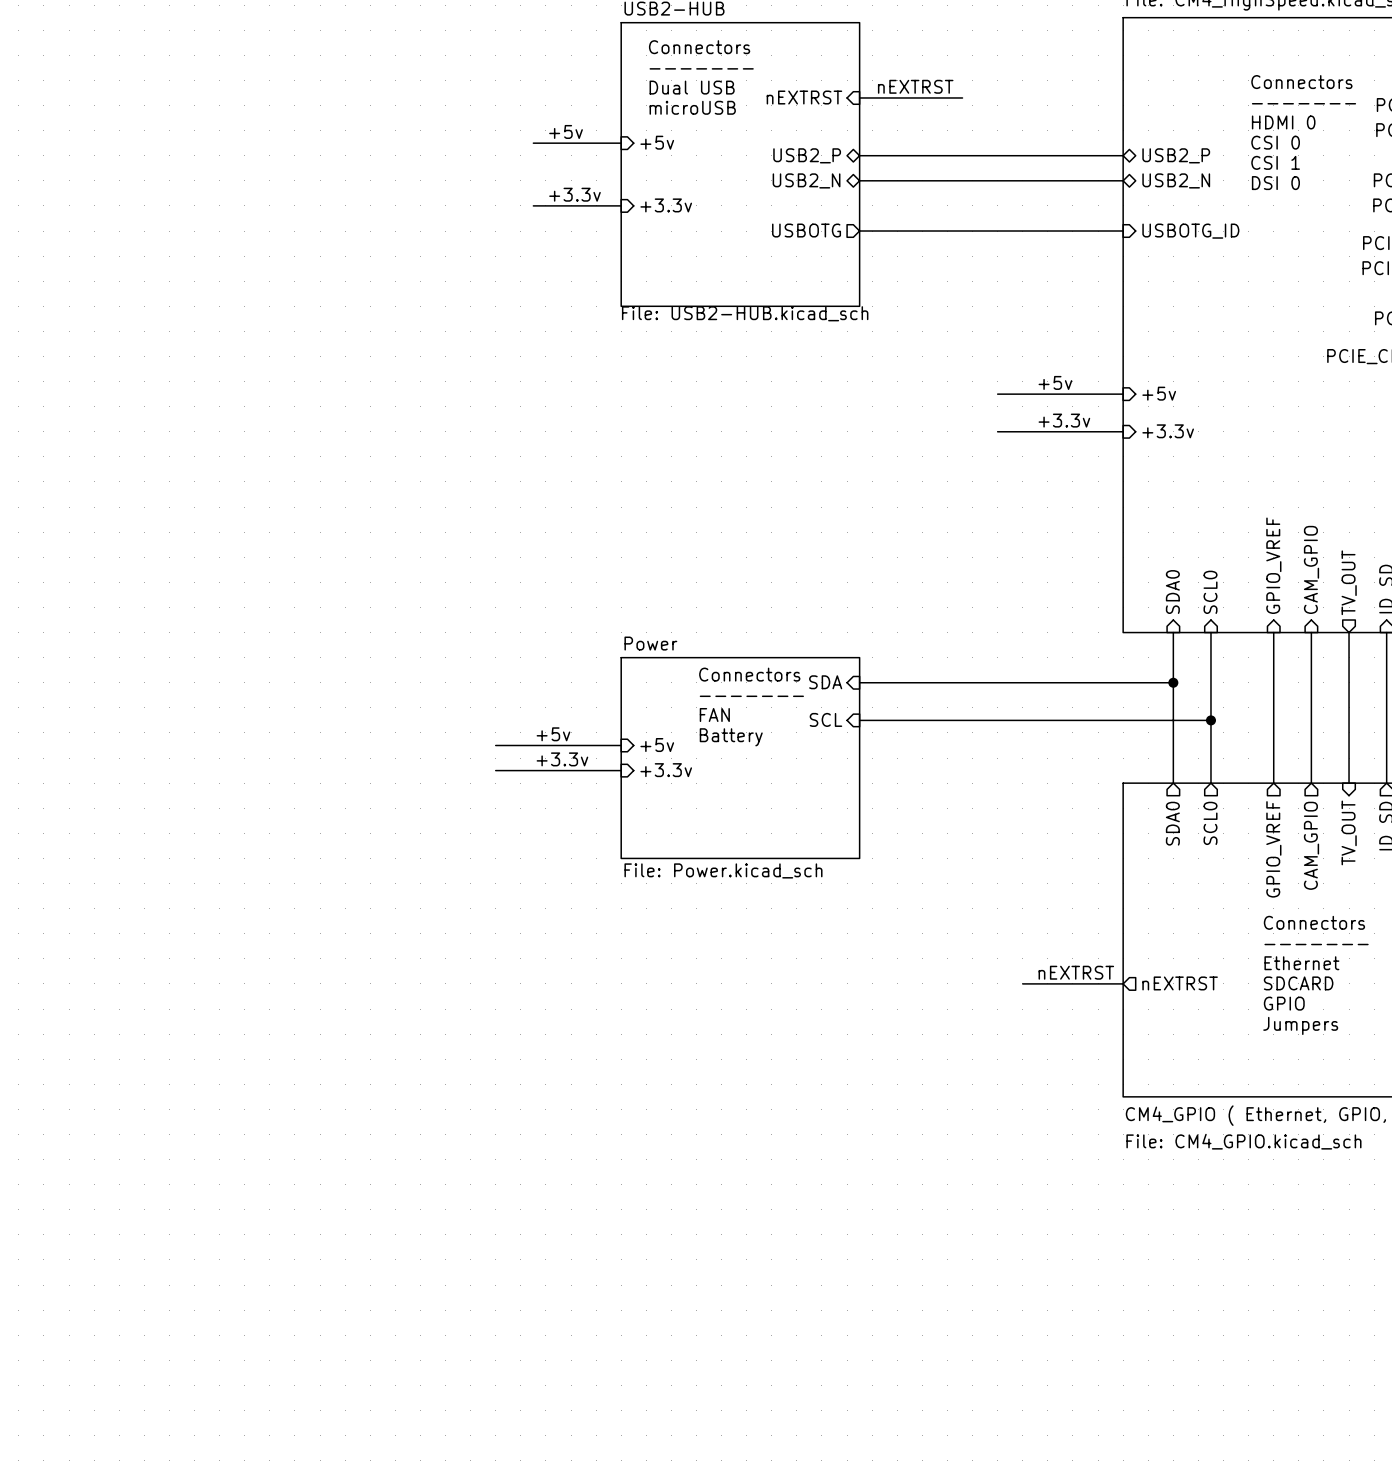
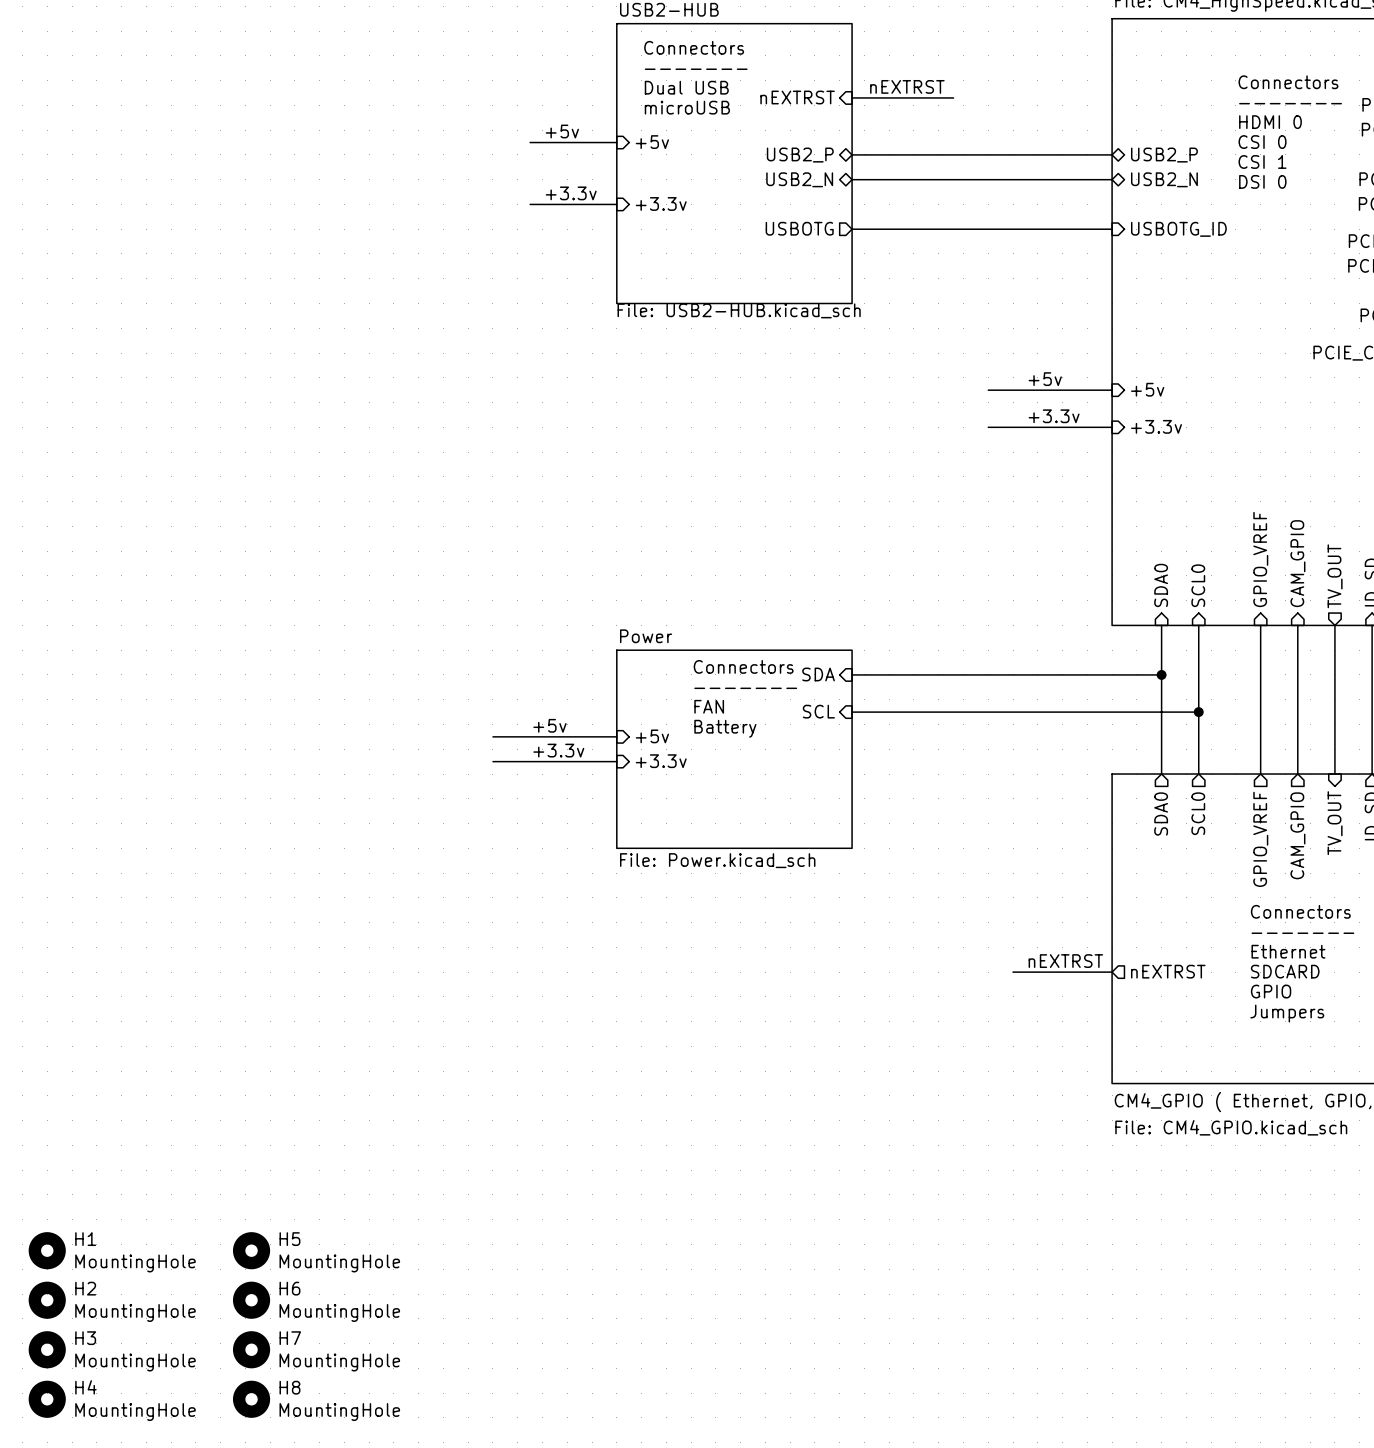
H1: none -> MountingHole (47, 1250)
H5: none -> MountingHole (251, 1250)
H2: none -> MountingHole (47, 1300)
H6: none -> MountingHole (251, 1300)
H3: none -> MountingHole (47, 1349)
H7: none -> MountingHole (251, 1349)
H4: none -> MountingHole (47, 1399)
H8: none -> MountingHole (251, 1399)

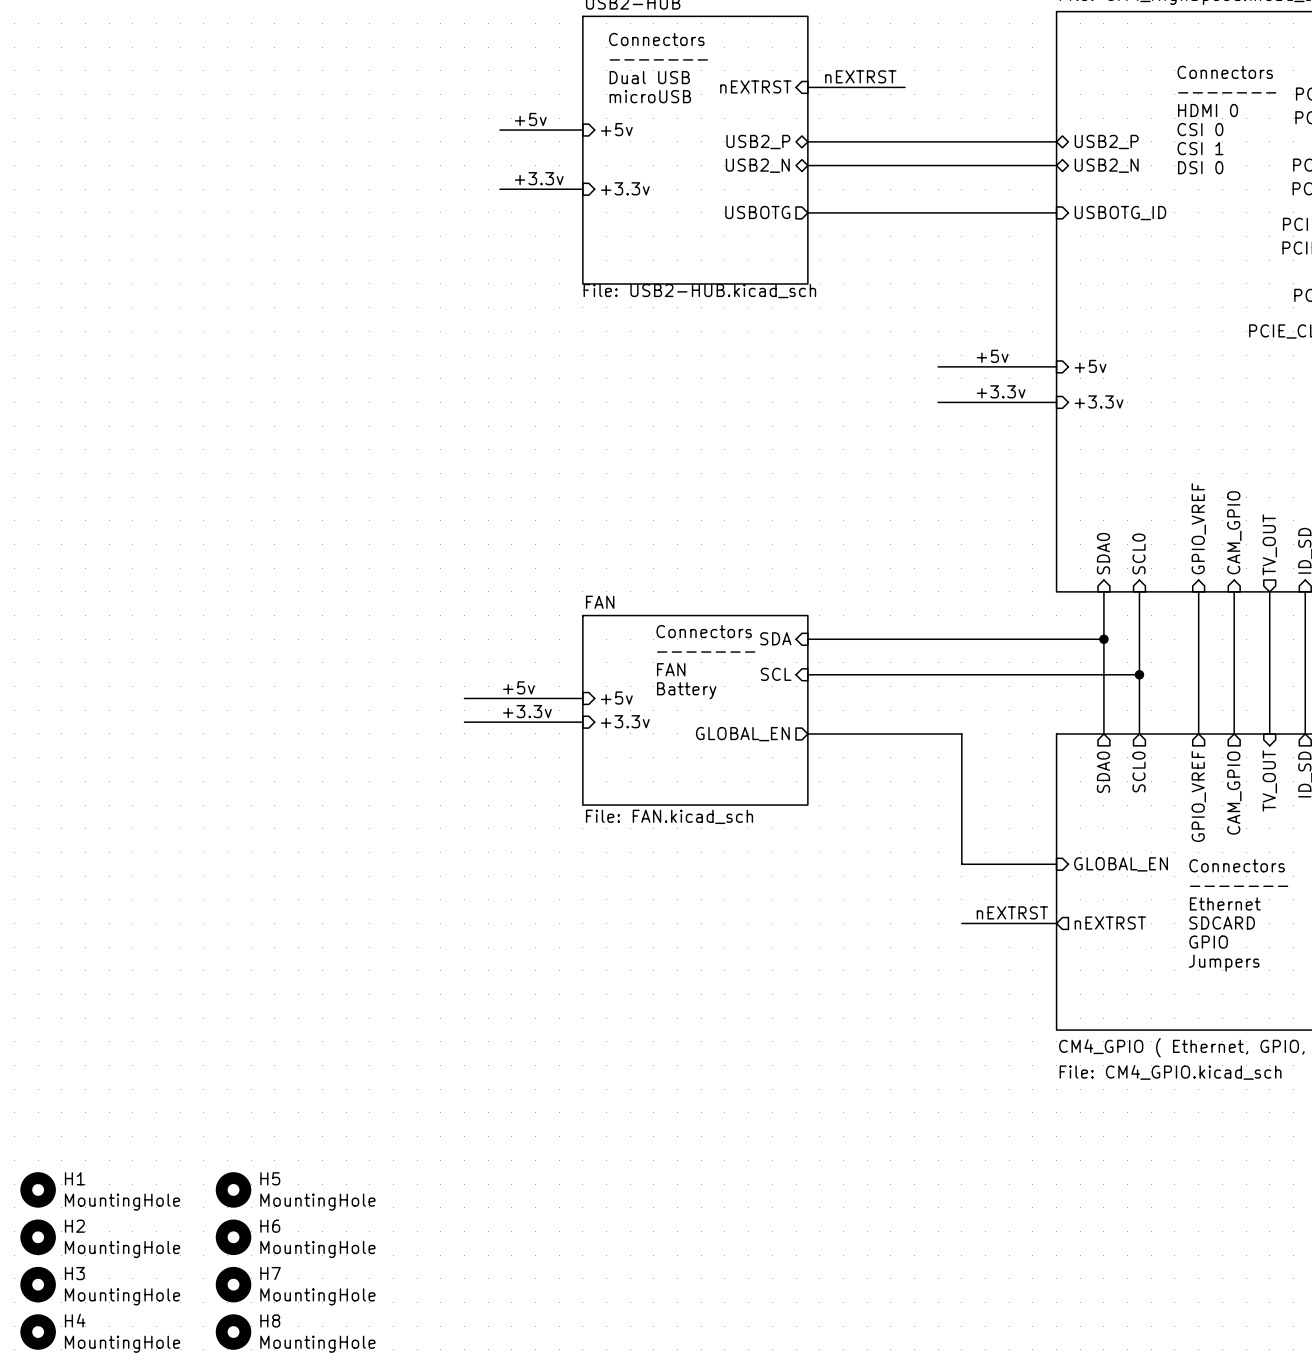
sheet Power name: Power (646, 636) -> FAN (600, 602)
sheet pin: none -> GLOBAL_EN (742, 734)
wire: none -> (807, 733) (961, 733) (961, 864) (1056, 864)
sheet Power value: File: Power.kicad_sch (717, 860) -> File: FAN.kicad_sch (669, 816)
sheet pin: none -> GLOBAL_EN (1121, 864)

